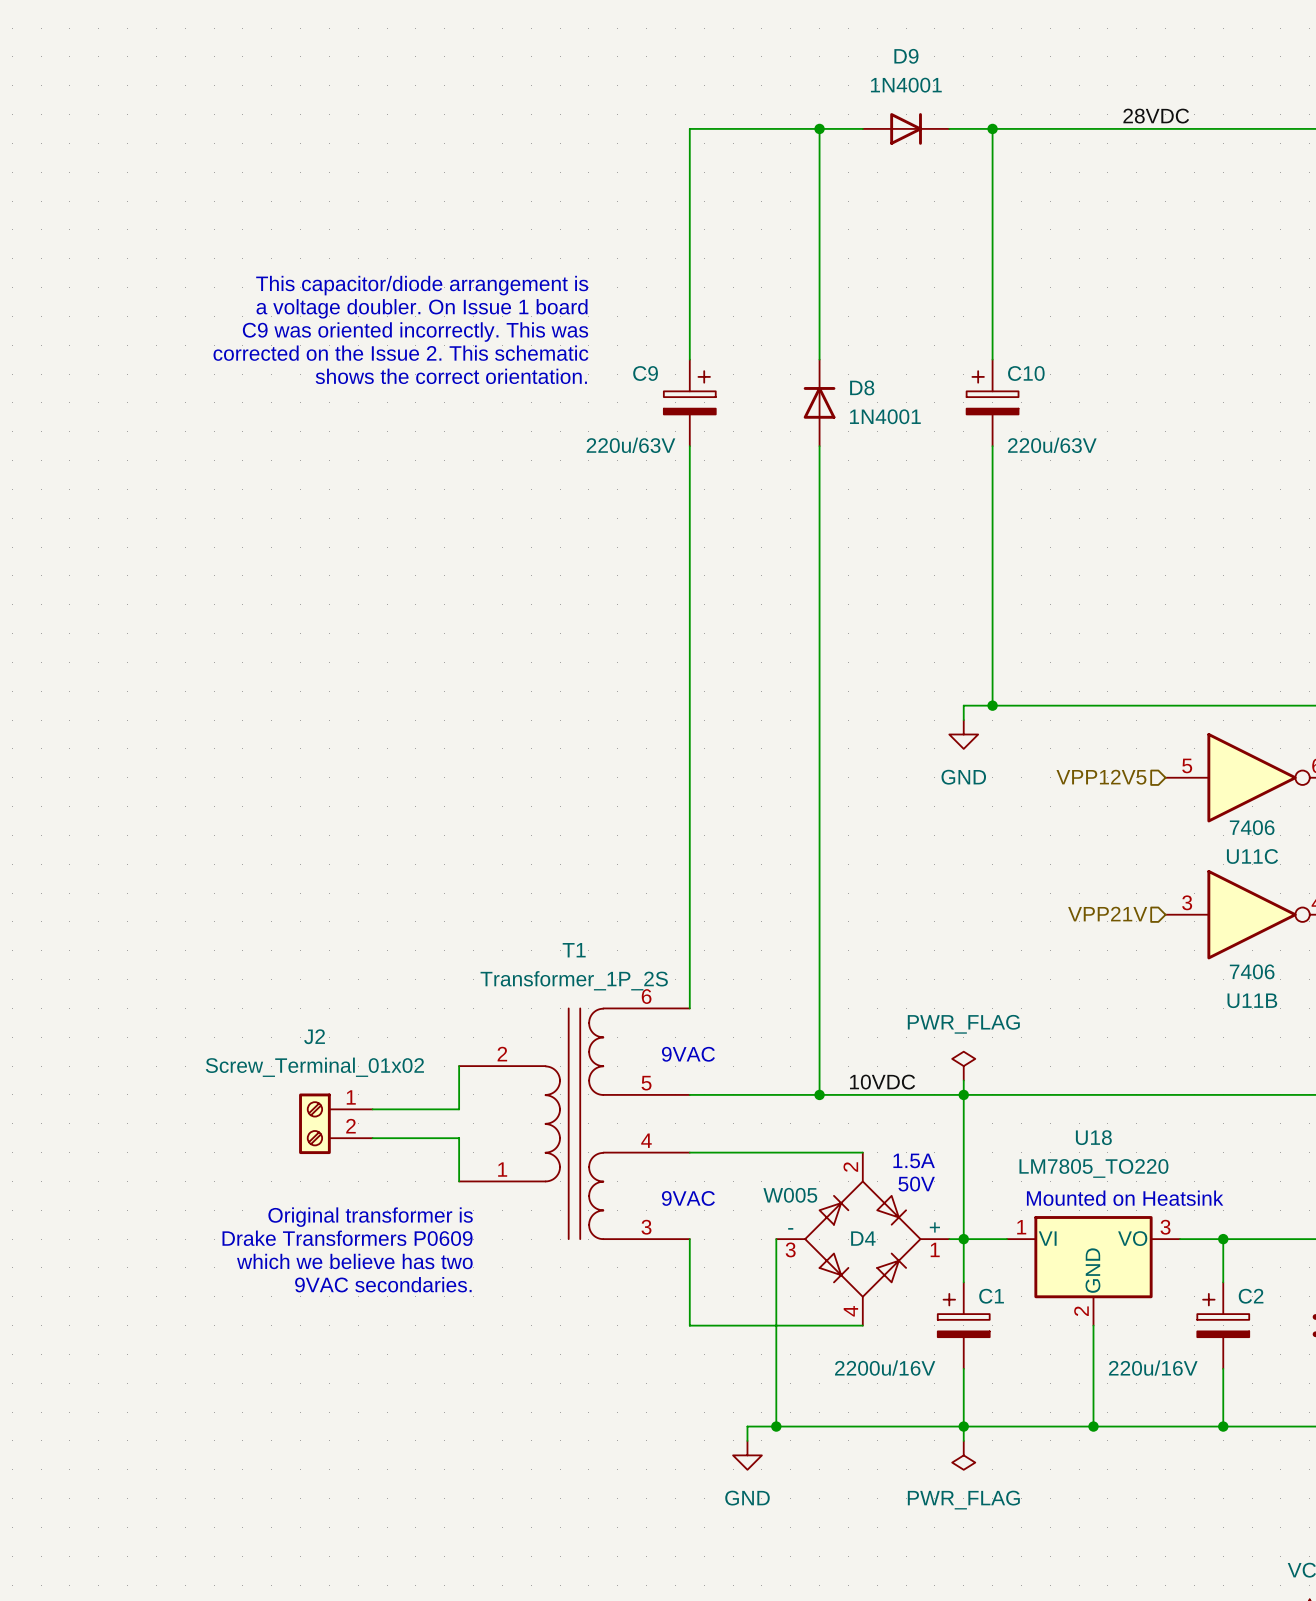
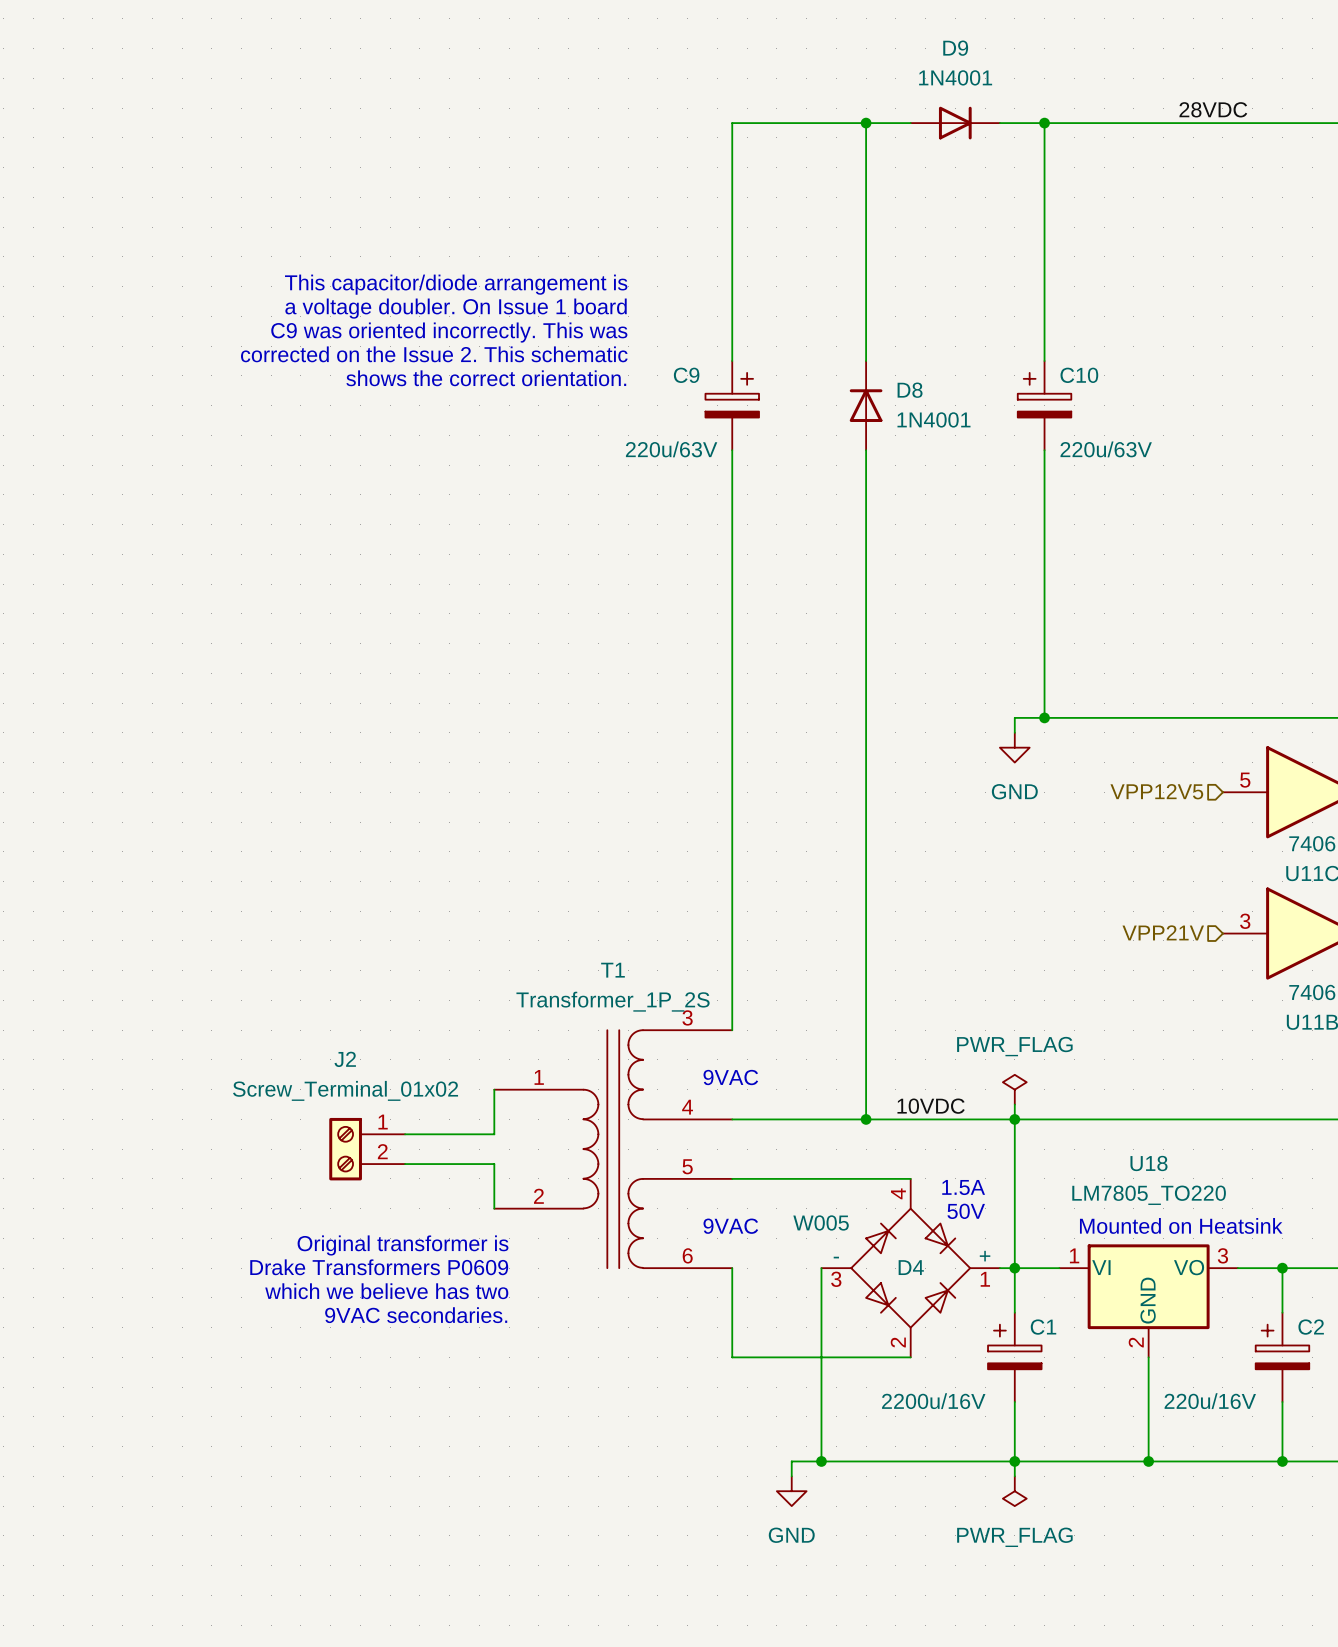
T1 flip: as is (574, 1123) -> up-down (613, 1149)
D4 flip: as is (862, 1239) -> up-down (910, 1268)

